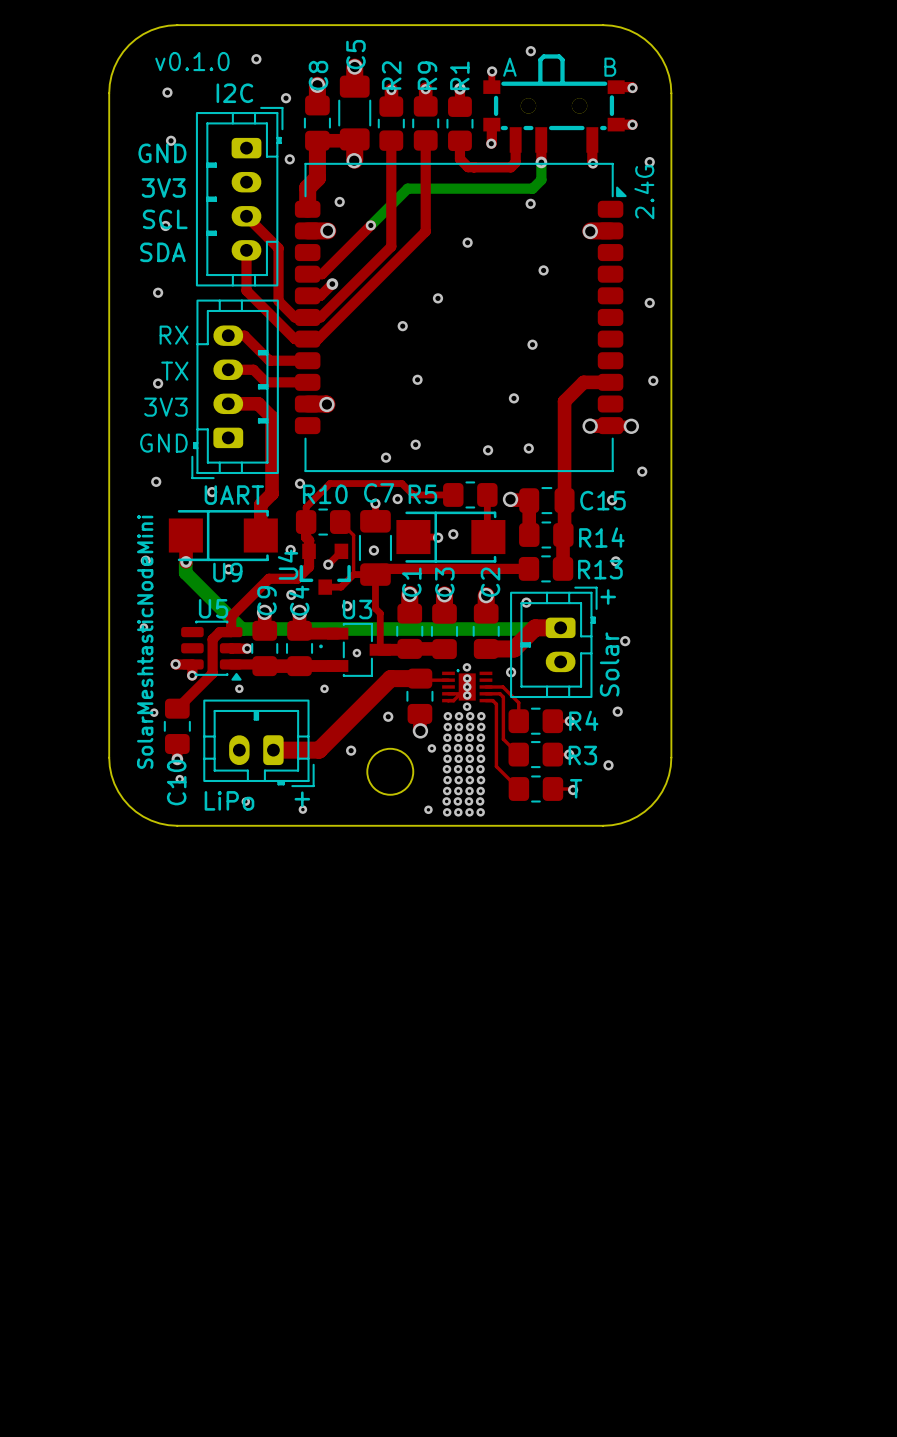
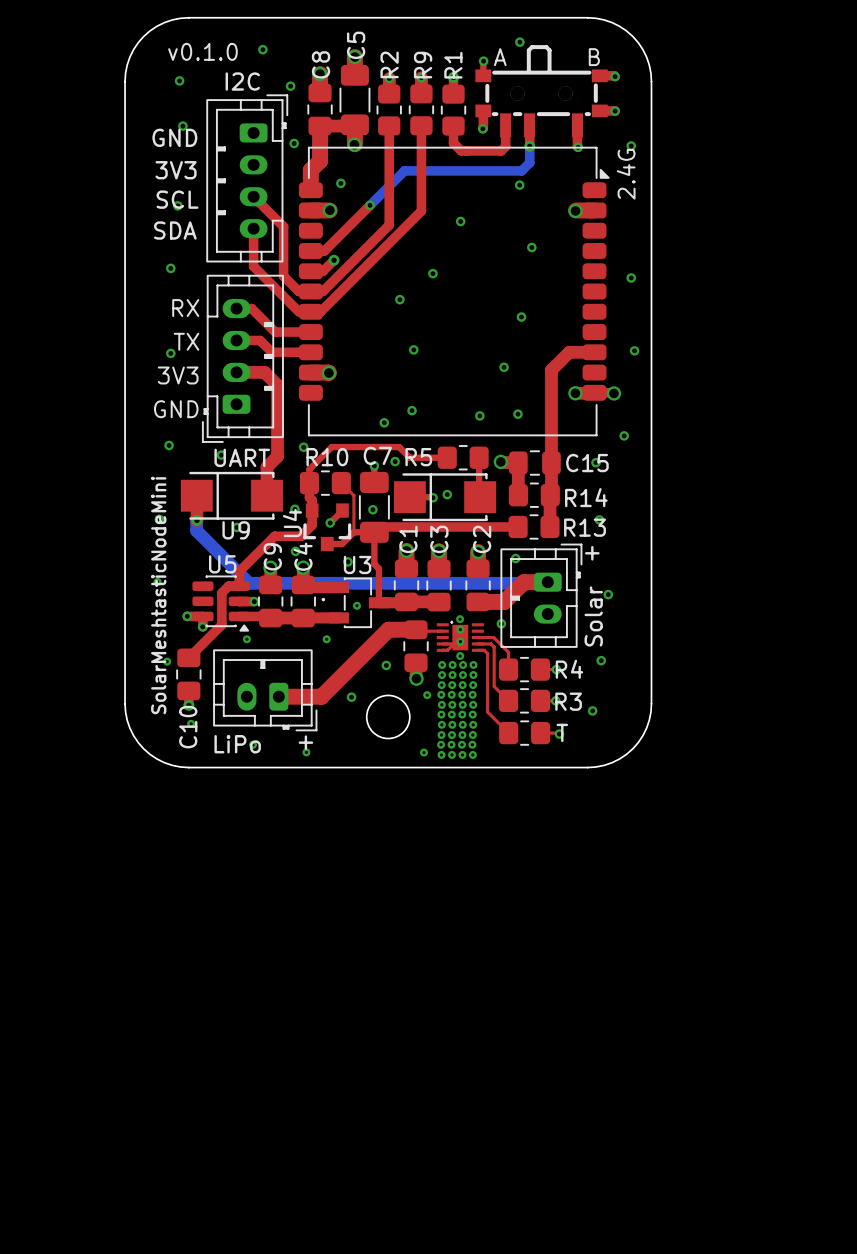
via: (467, 686) -> none
via: none -> (460, 641)
via: (467, 695) -> none

